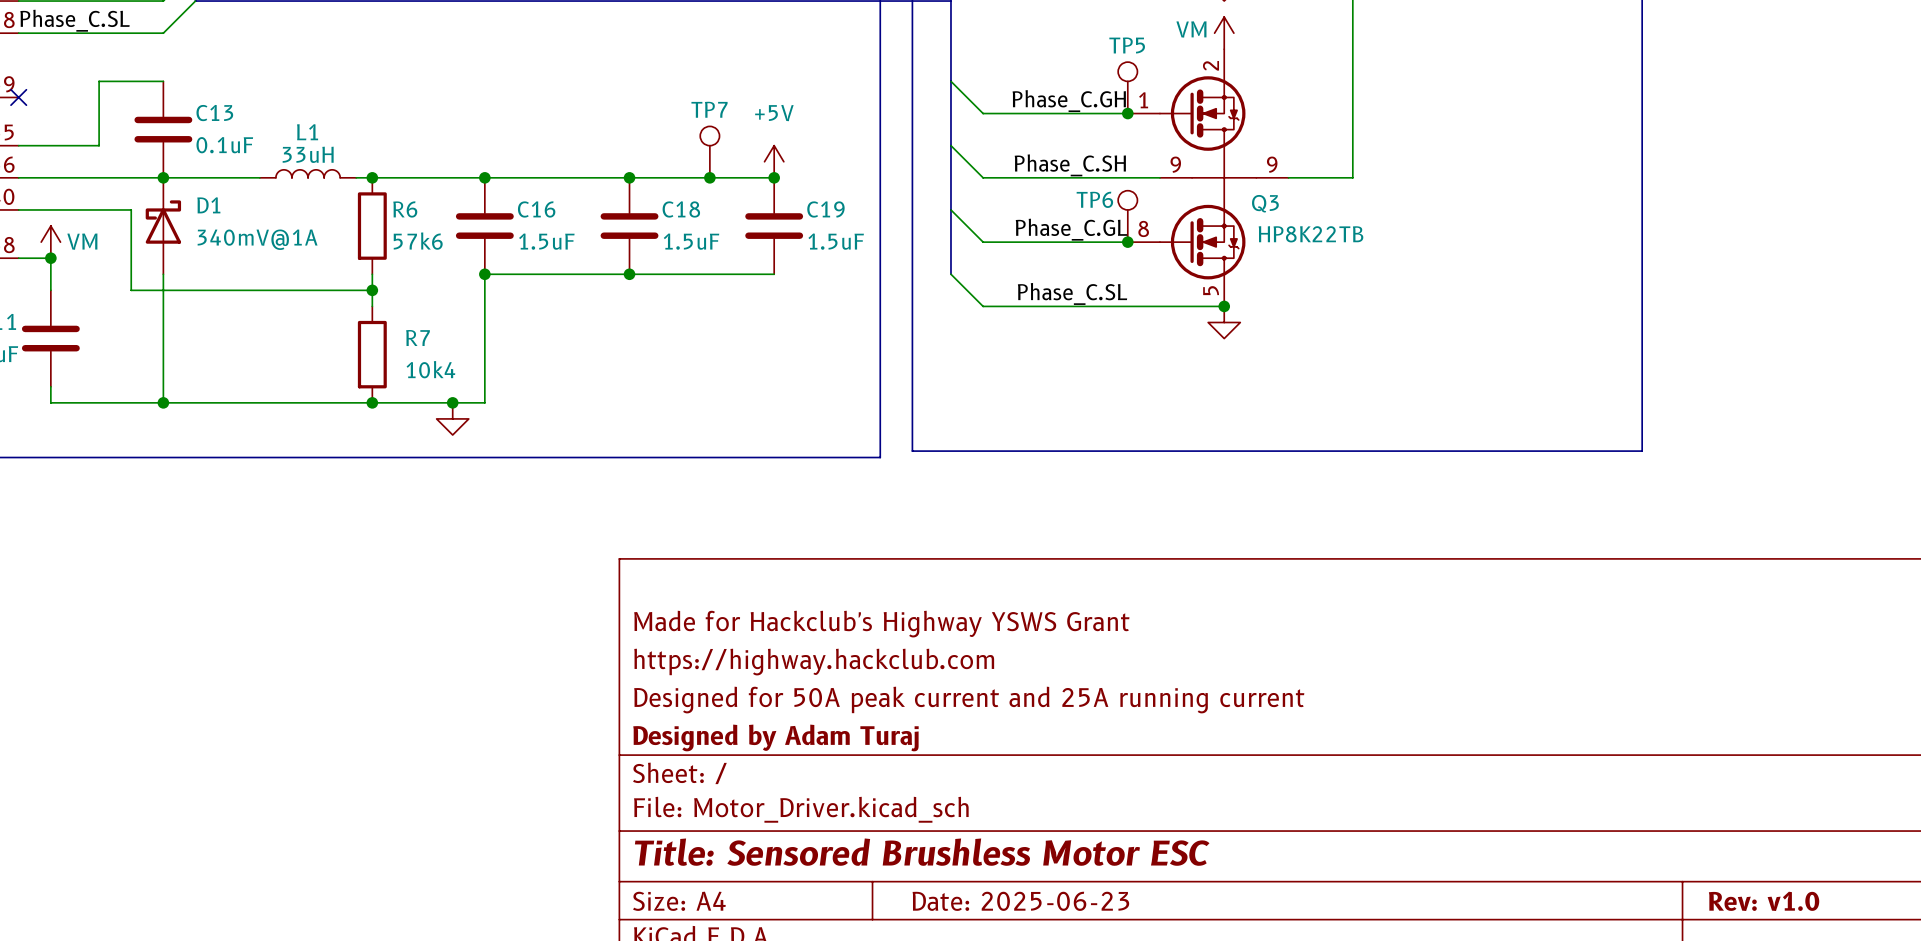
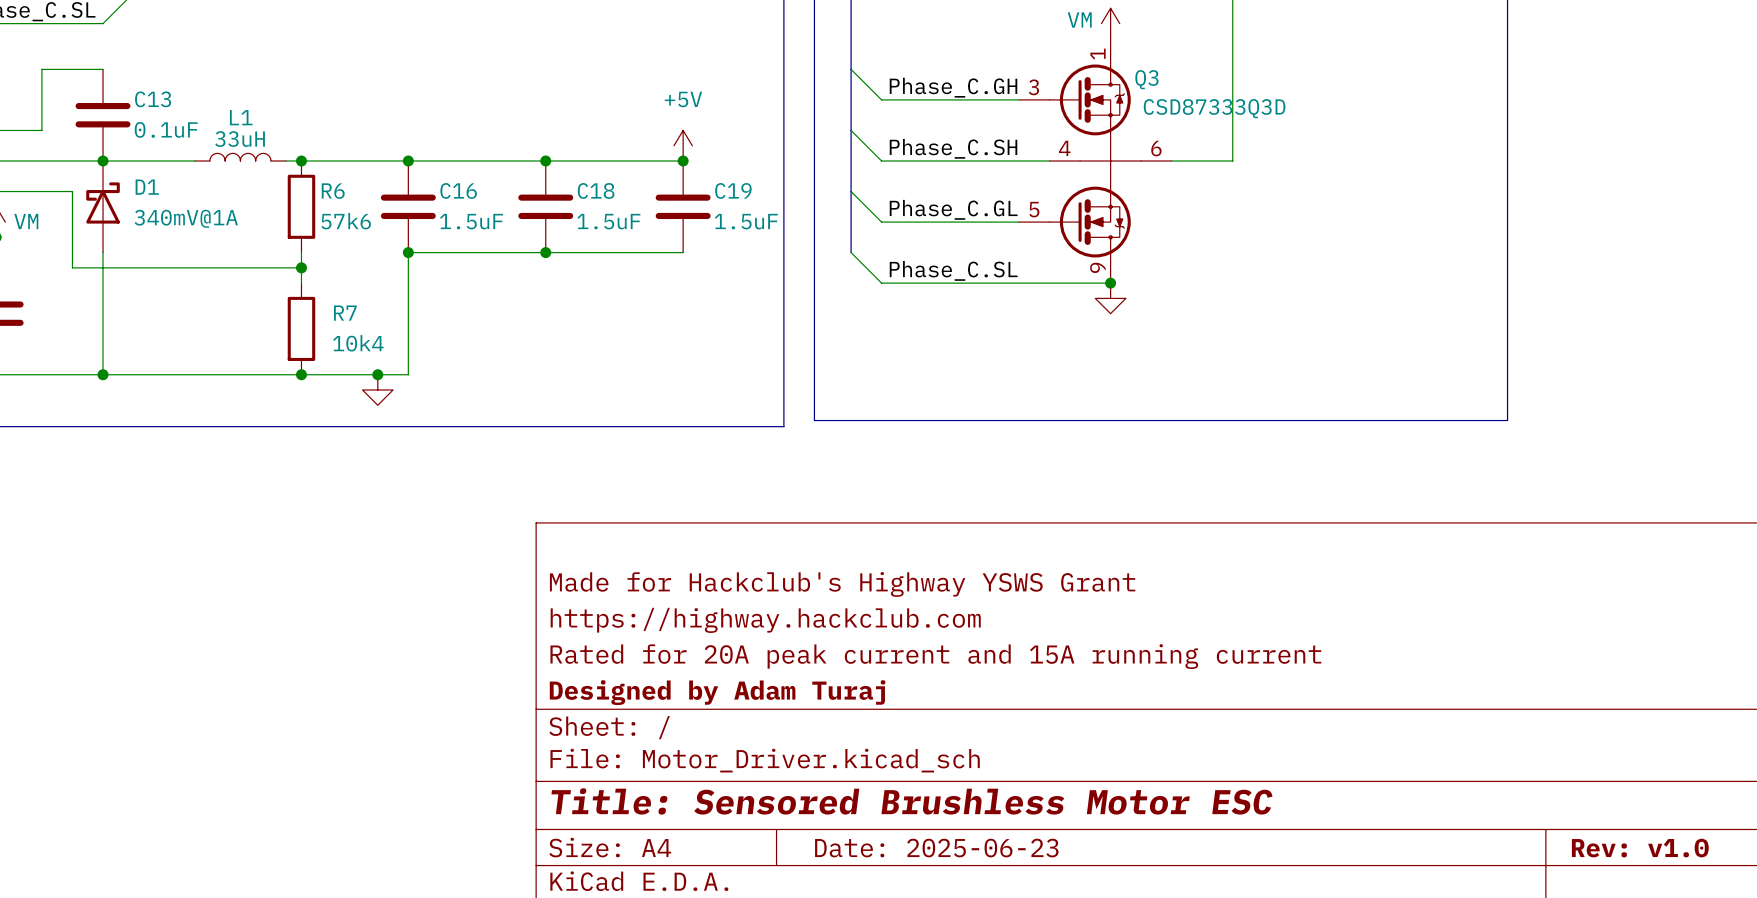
Q3 symbol: [1127, 49, 1289, 307] -> [1019, 38, 1172, 284]
TP5: (1127, 87) -> none
junction: (1127, 113) -> none
TP7: (709, 152) -> none
junction: (709, 177) -> none
Q3 name position: Q3 (1265, 203) -> Q3 (1146, 79)
TP6: (1127, 216) -> none
Q3 value: HP8K22TB (1311, 234) -> CSD87333Q3D (1214, 108)
junction: (1127, 242) -> none
title block: Designed for 50A peak current and 25A running current (969, 700) -> Rated for 20A peak current and 15A running current (935, 656)

